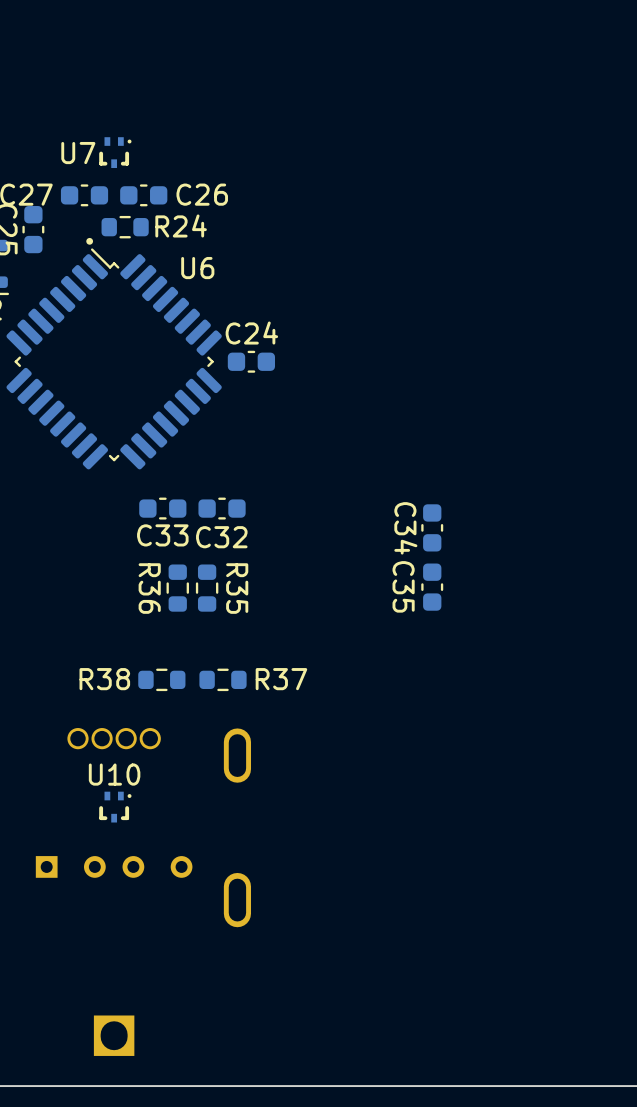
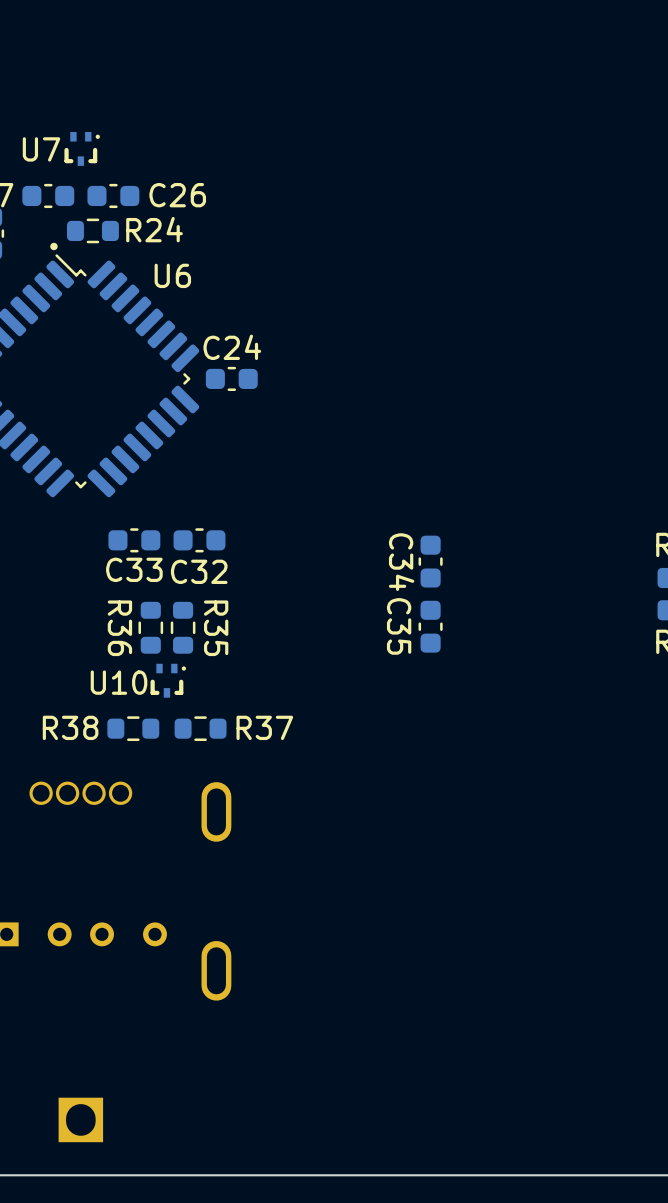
U10 name position: U10 (114, 774) -> U10 (119, 682)
U10 position: (115, 807) -> (168, 680)

